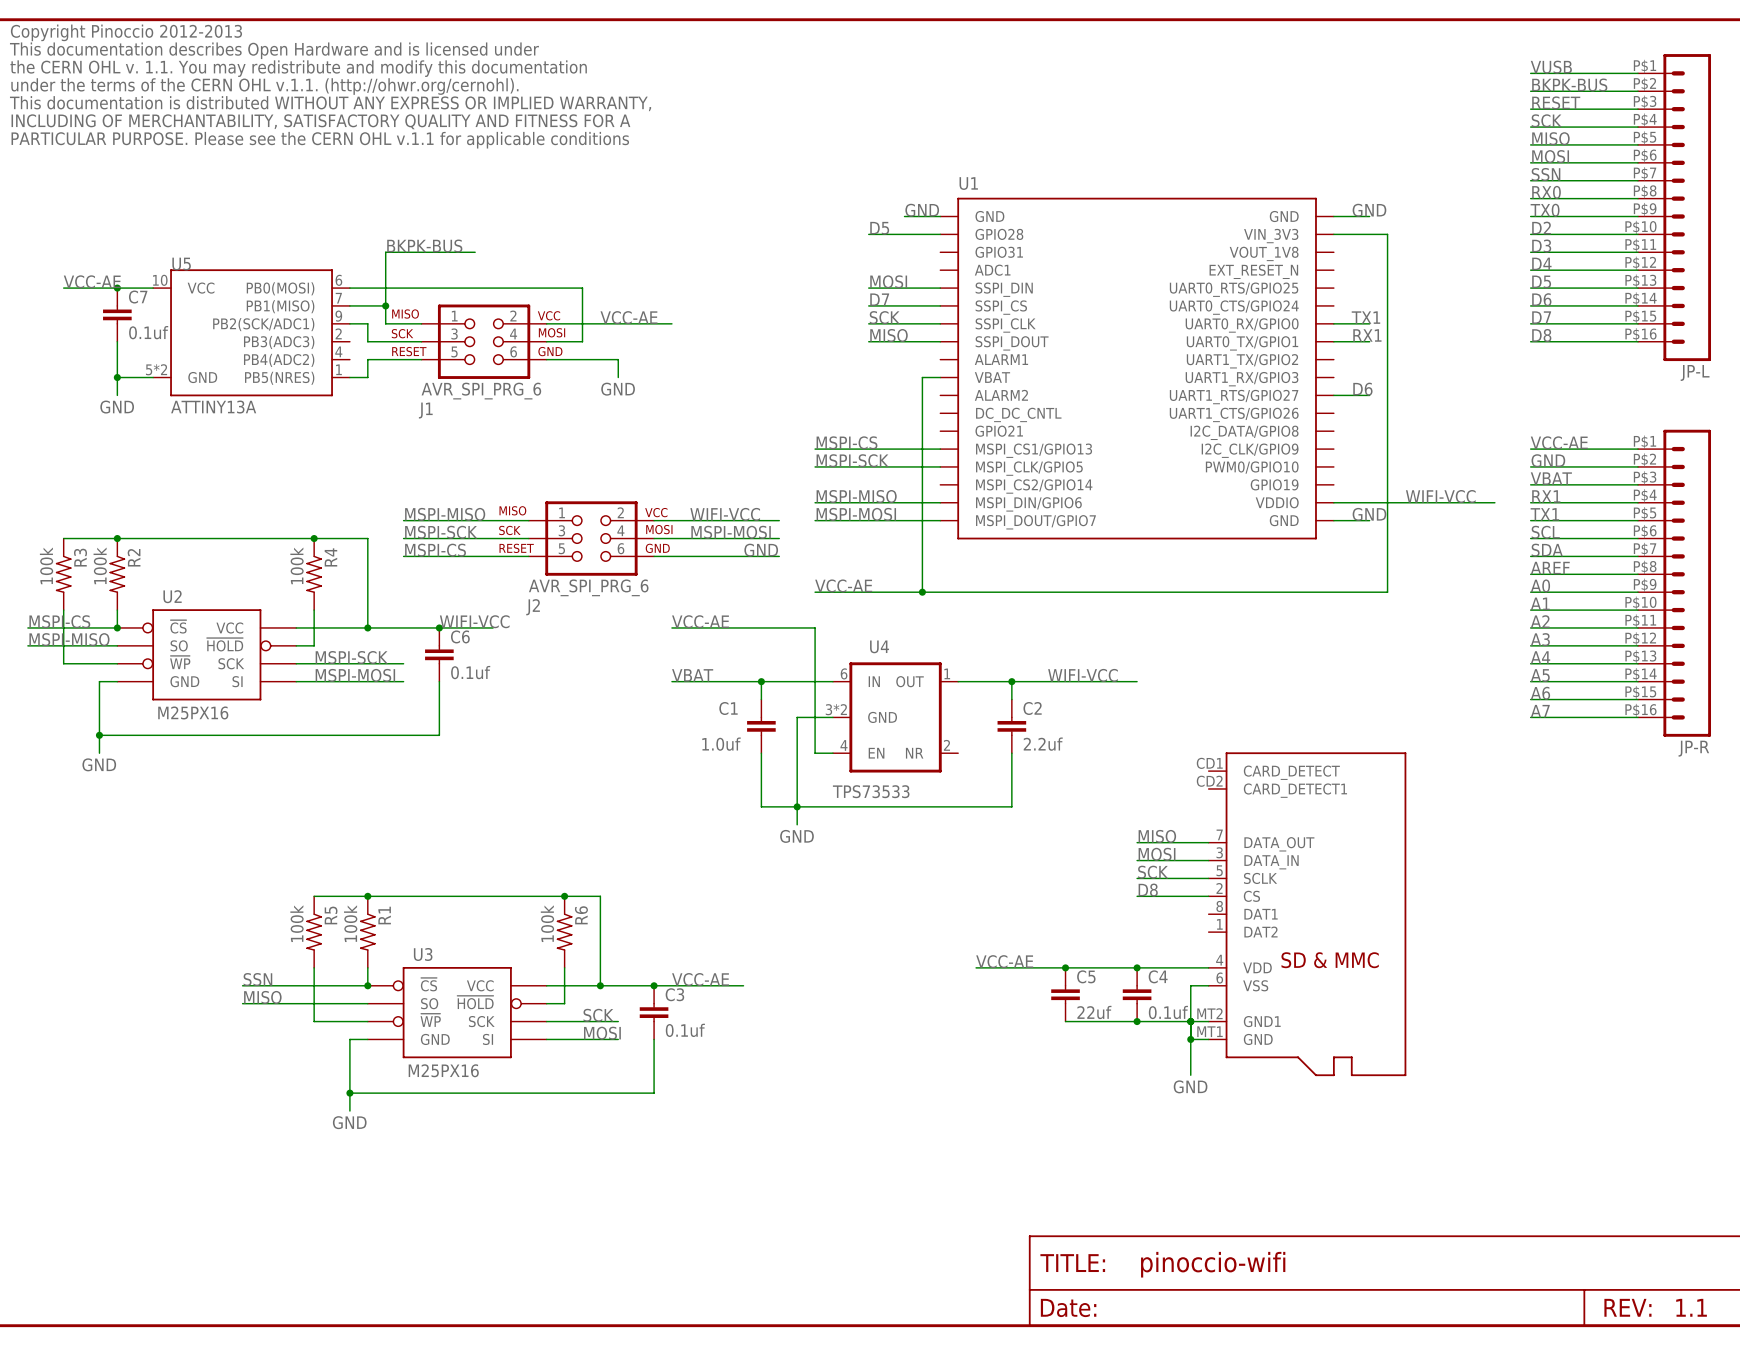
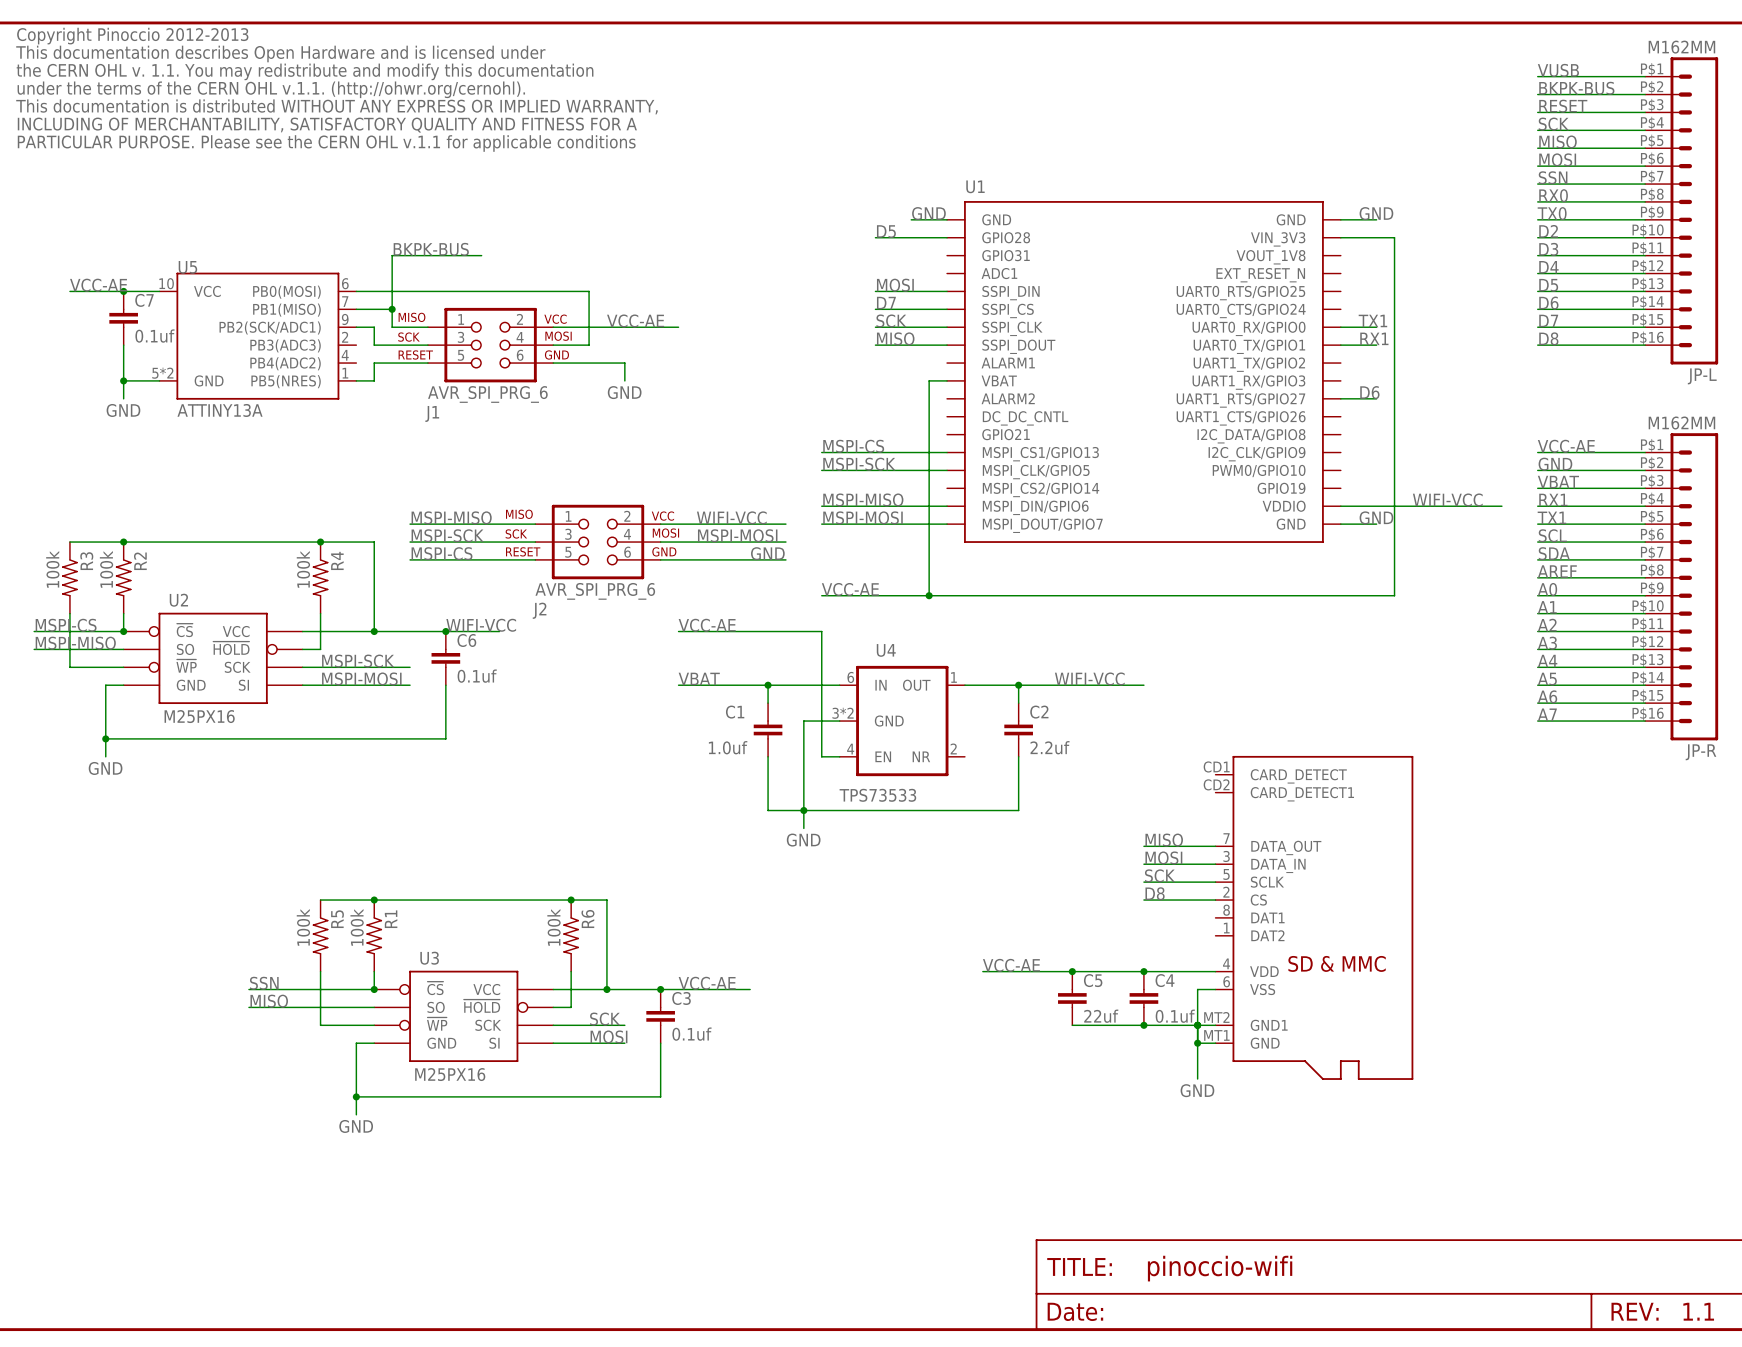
JP-L value: none -> M162MM (1681, 47)
JP-R value: none -> M162MM (1681, 423)

